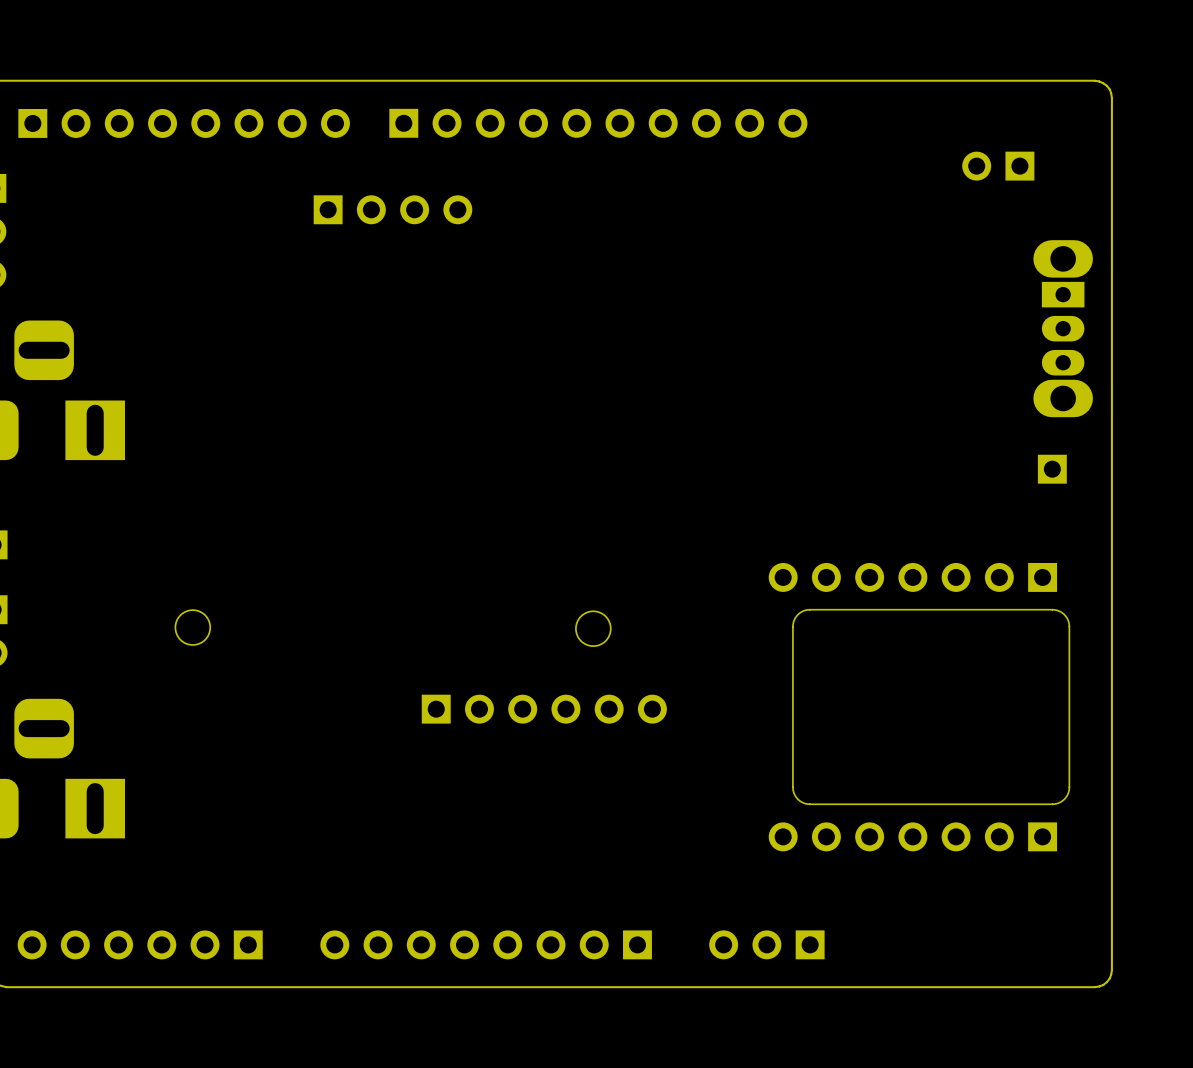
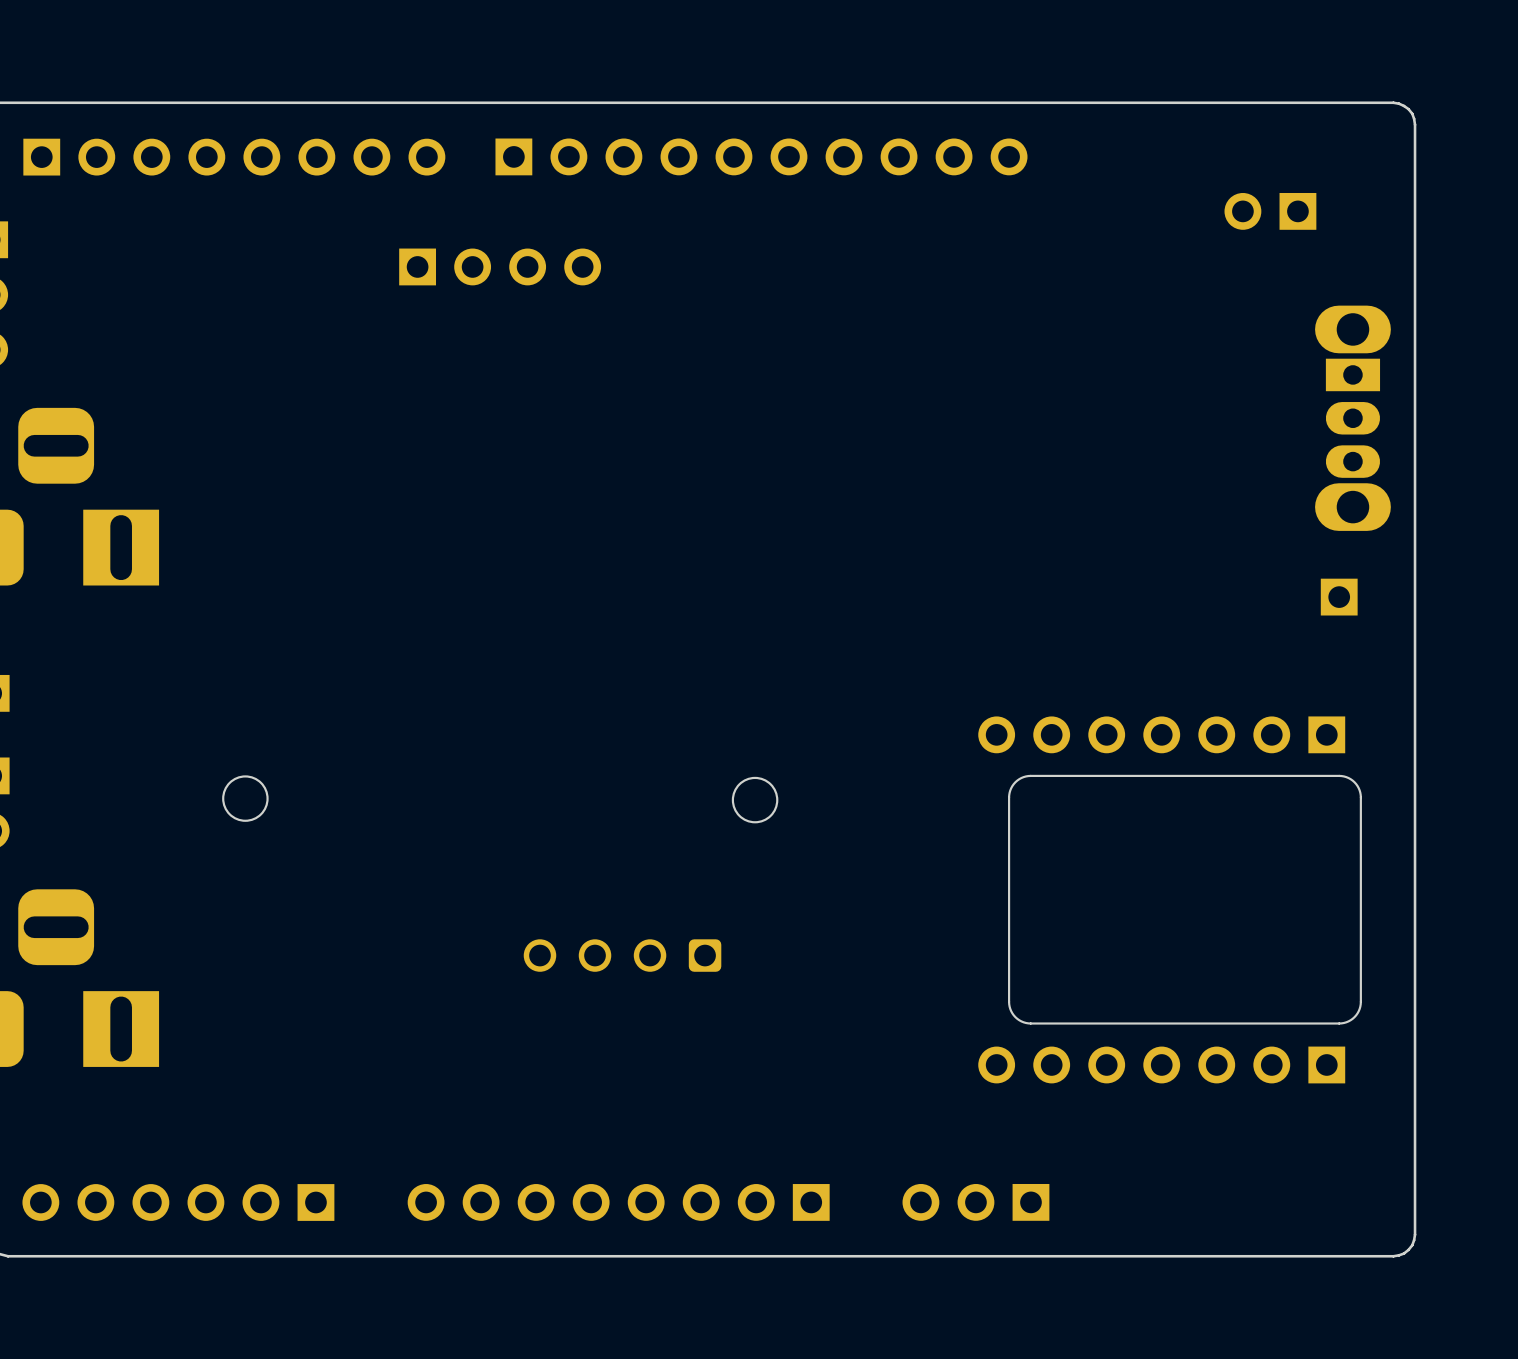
part: (544, 709) -> none
part: none -> (622, 955)

